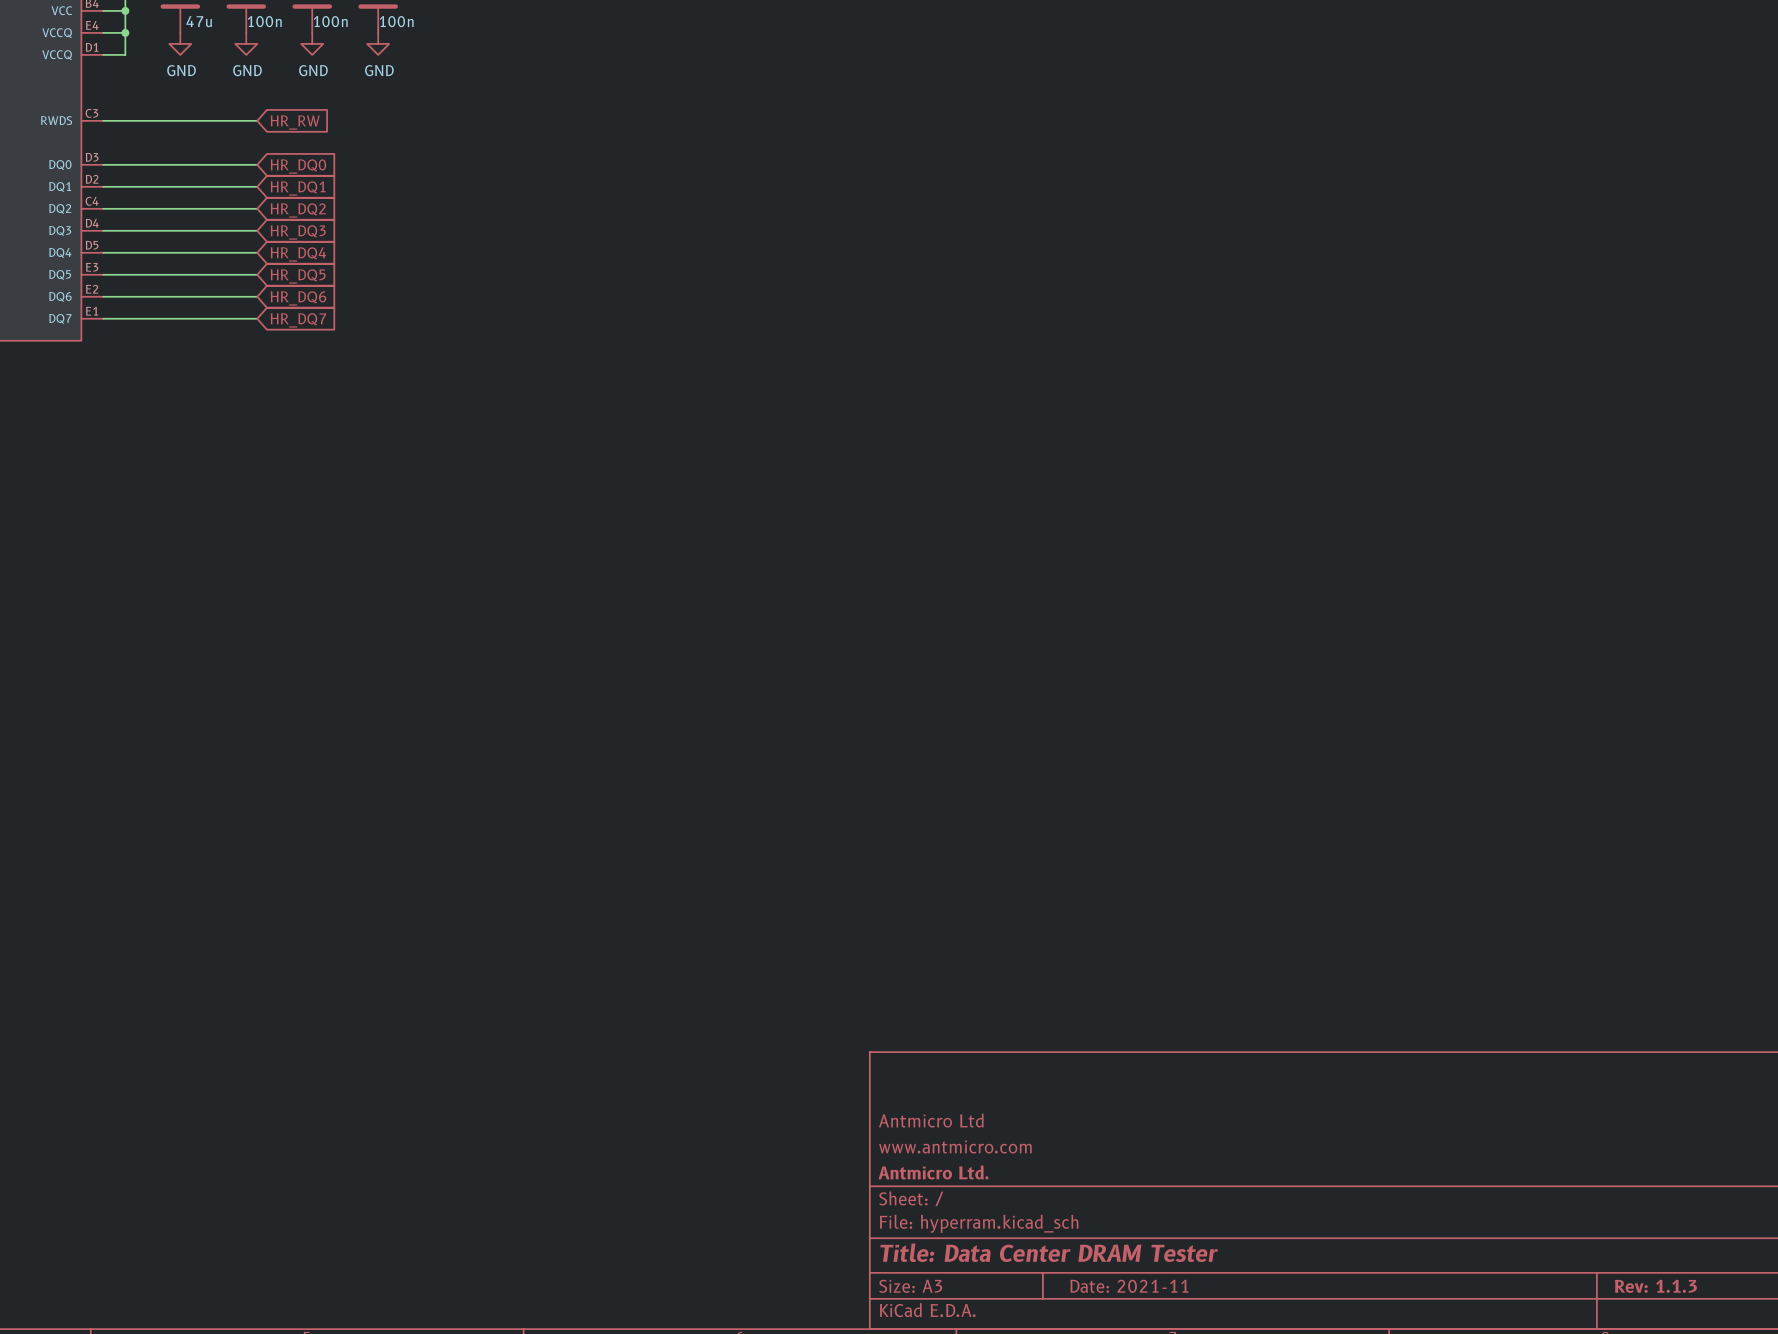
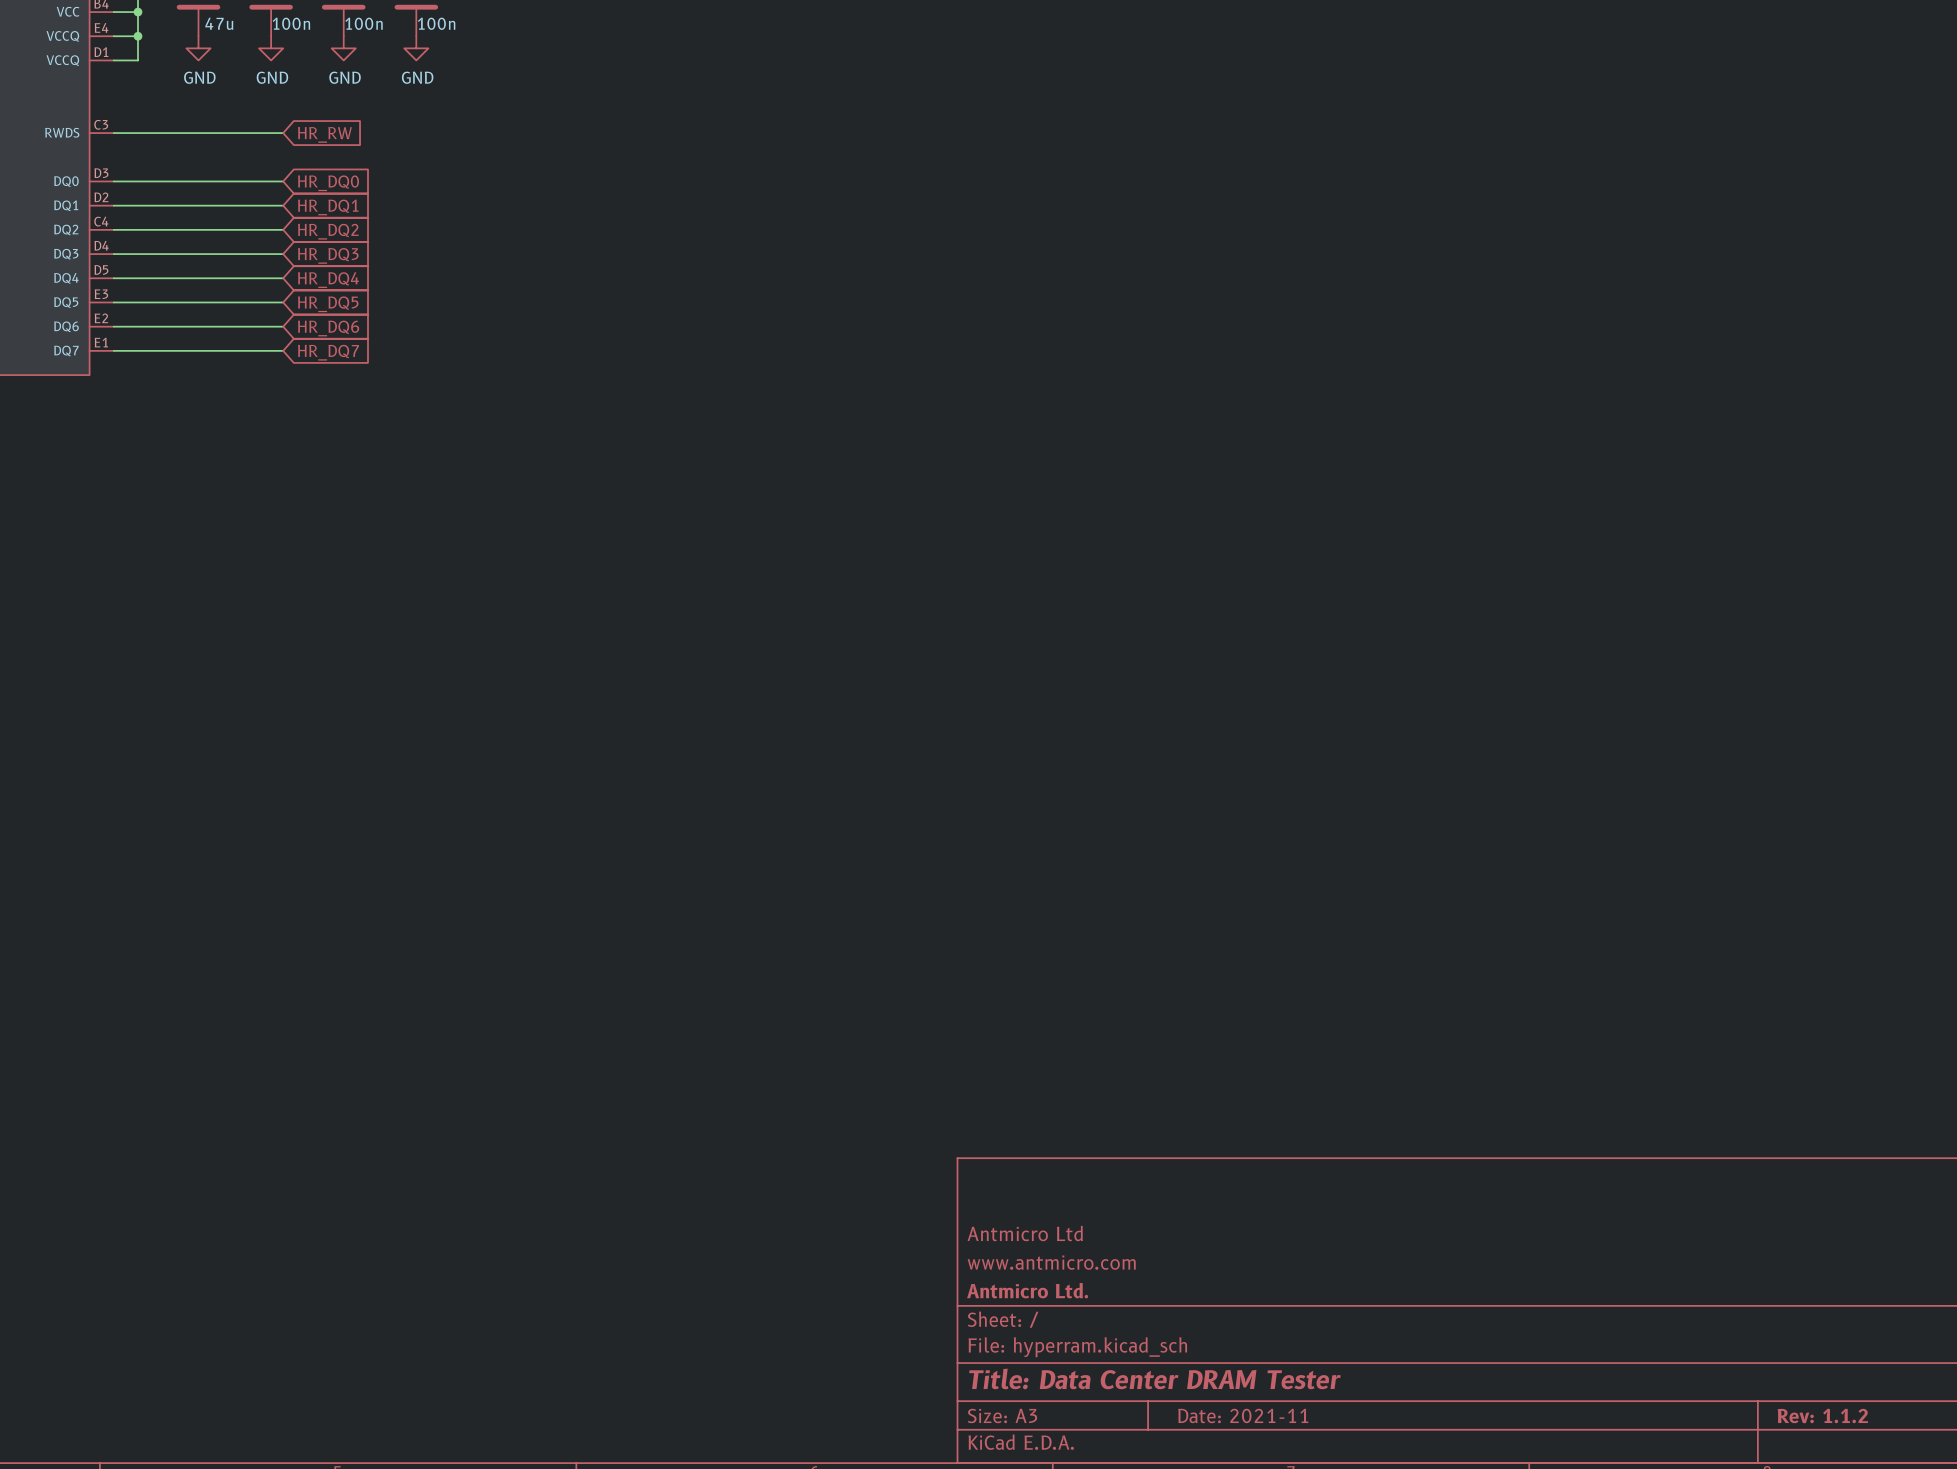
title block: Rev: 1.1.3 (1655, 1286) -> Rev: 1.1.2 (1822, 1416)

